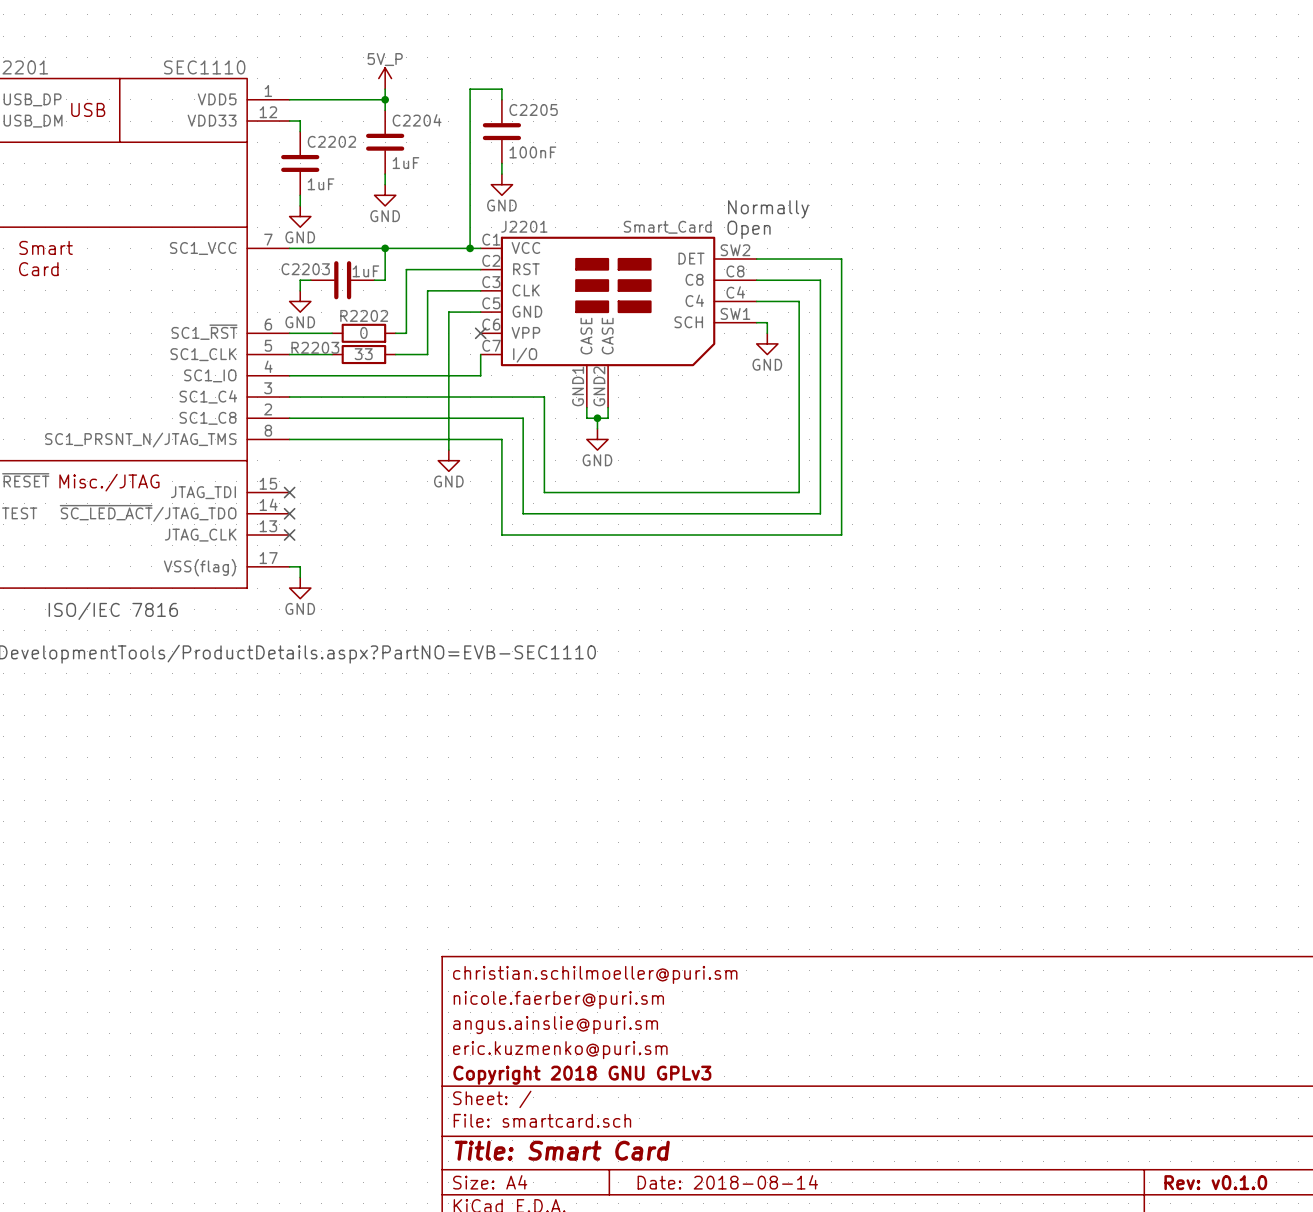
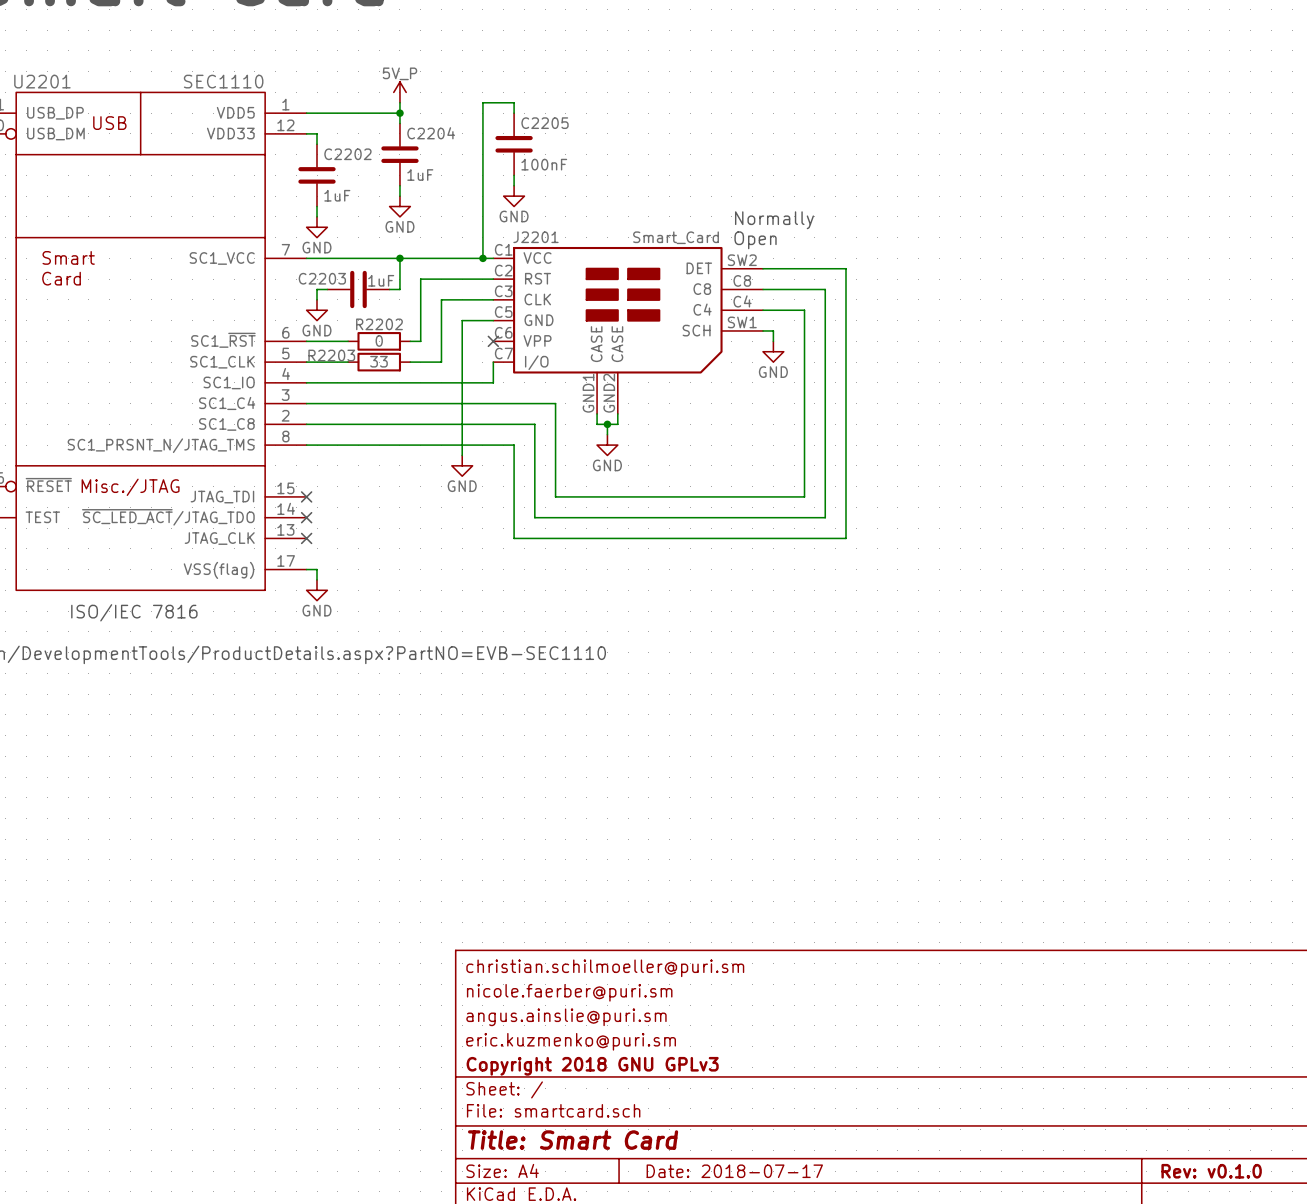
title block: Date: 2018-08-14 (727, 1182) -> Date: 2018-07-17 (734, 1171)

